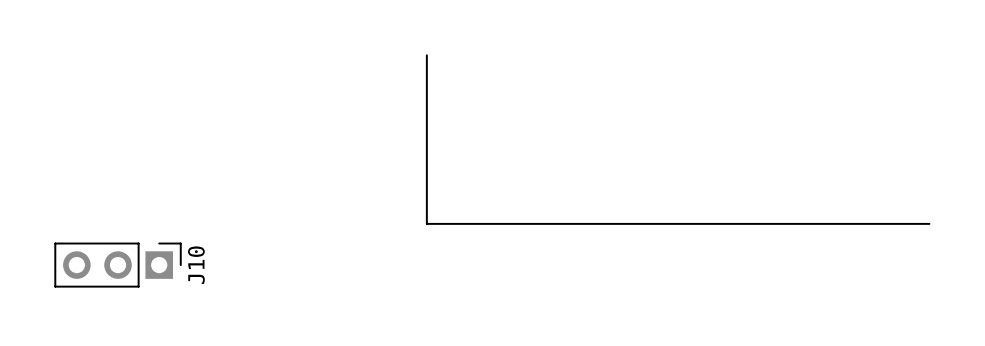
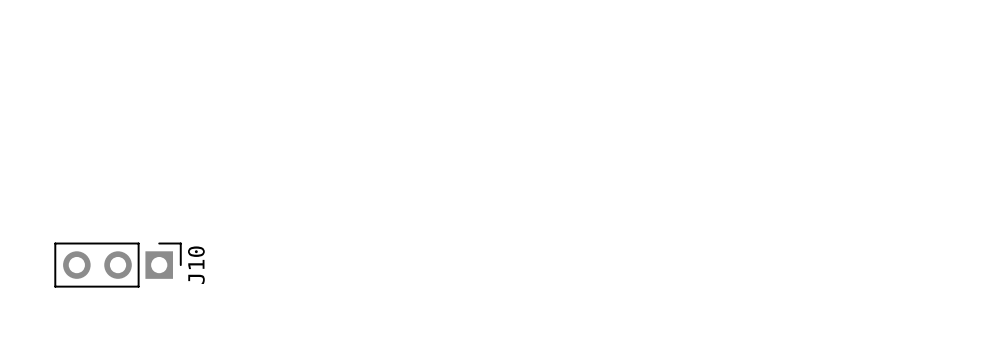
line: (426, 55) (426, 223) (929, 223) -> none

